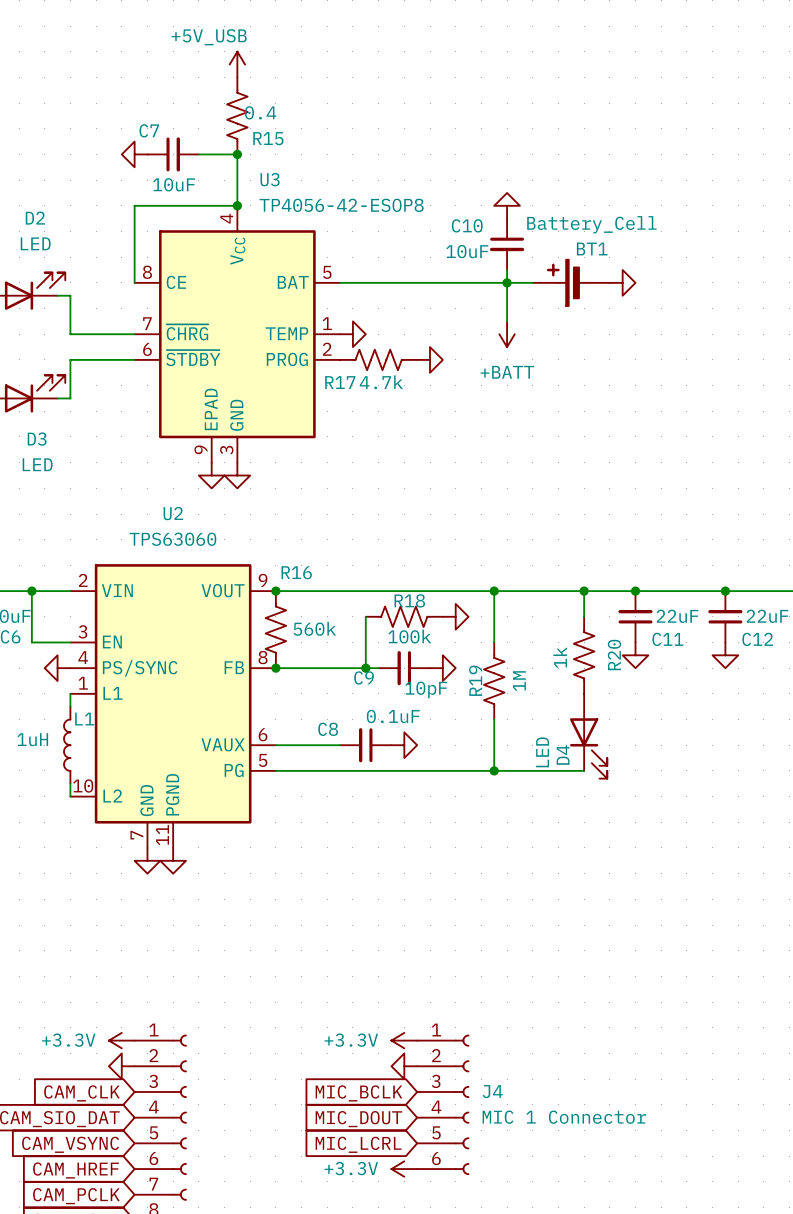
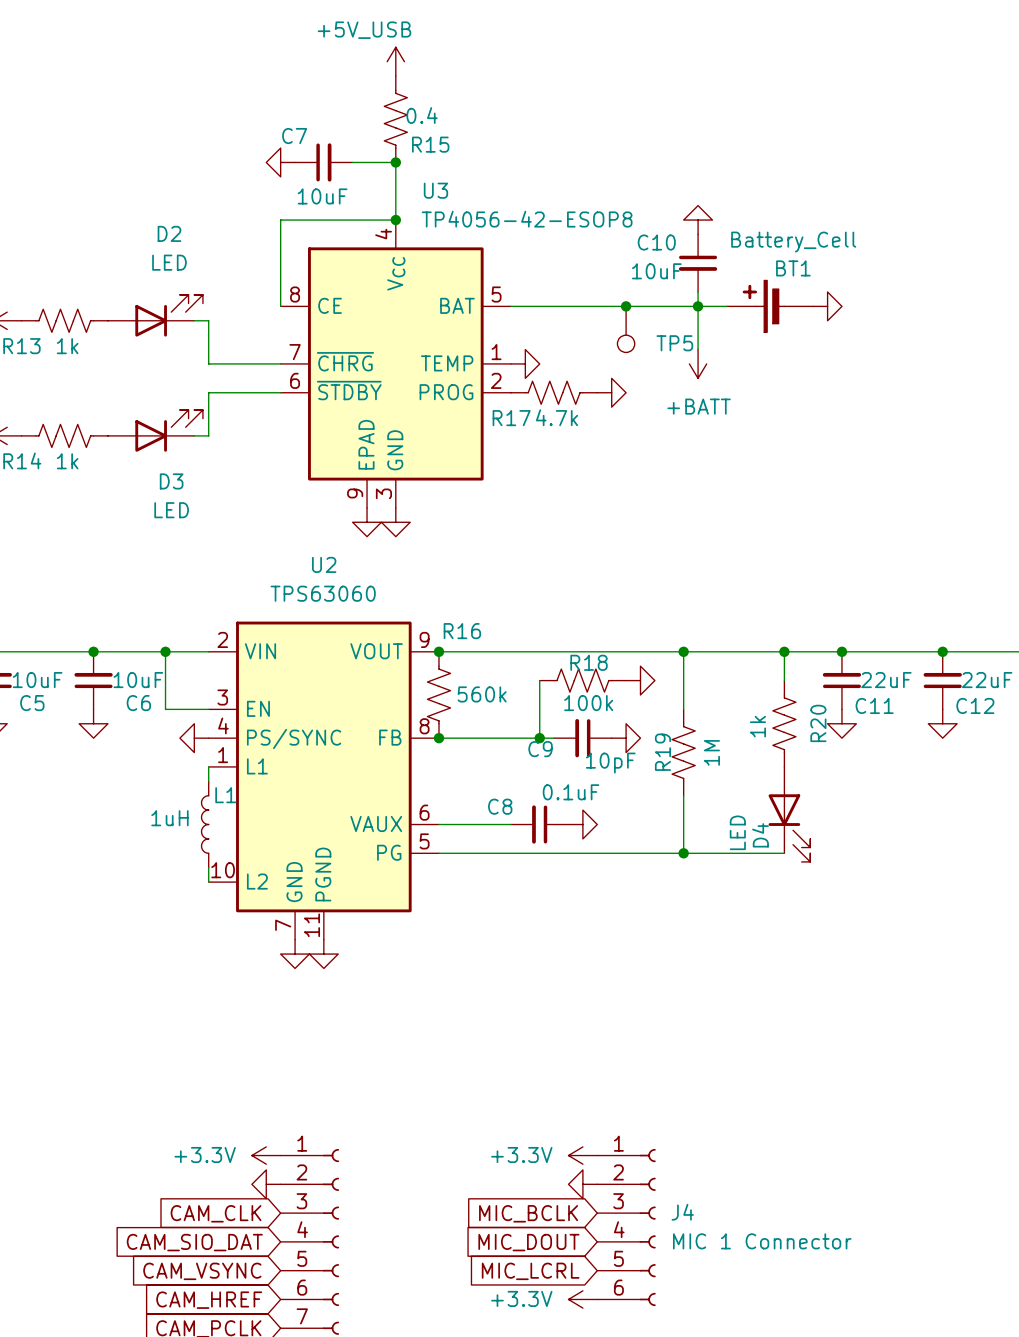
junction: none -> (626, 306)
TP5: none -> (626, 329)

